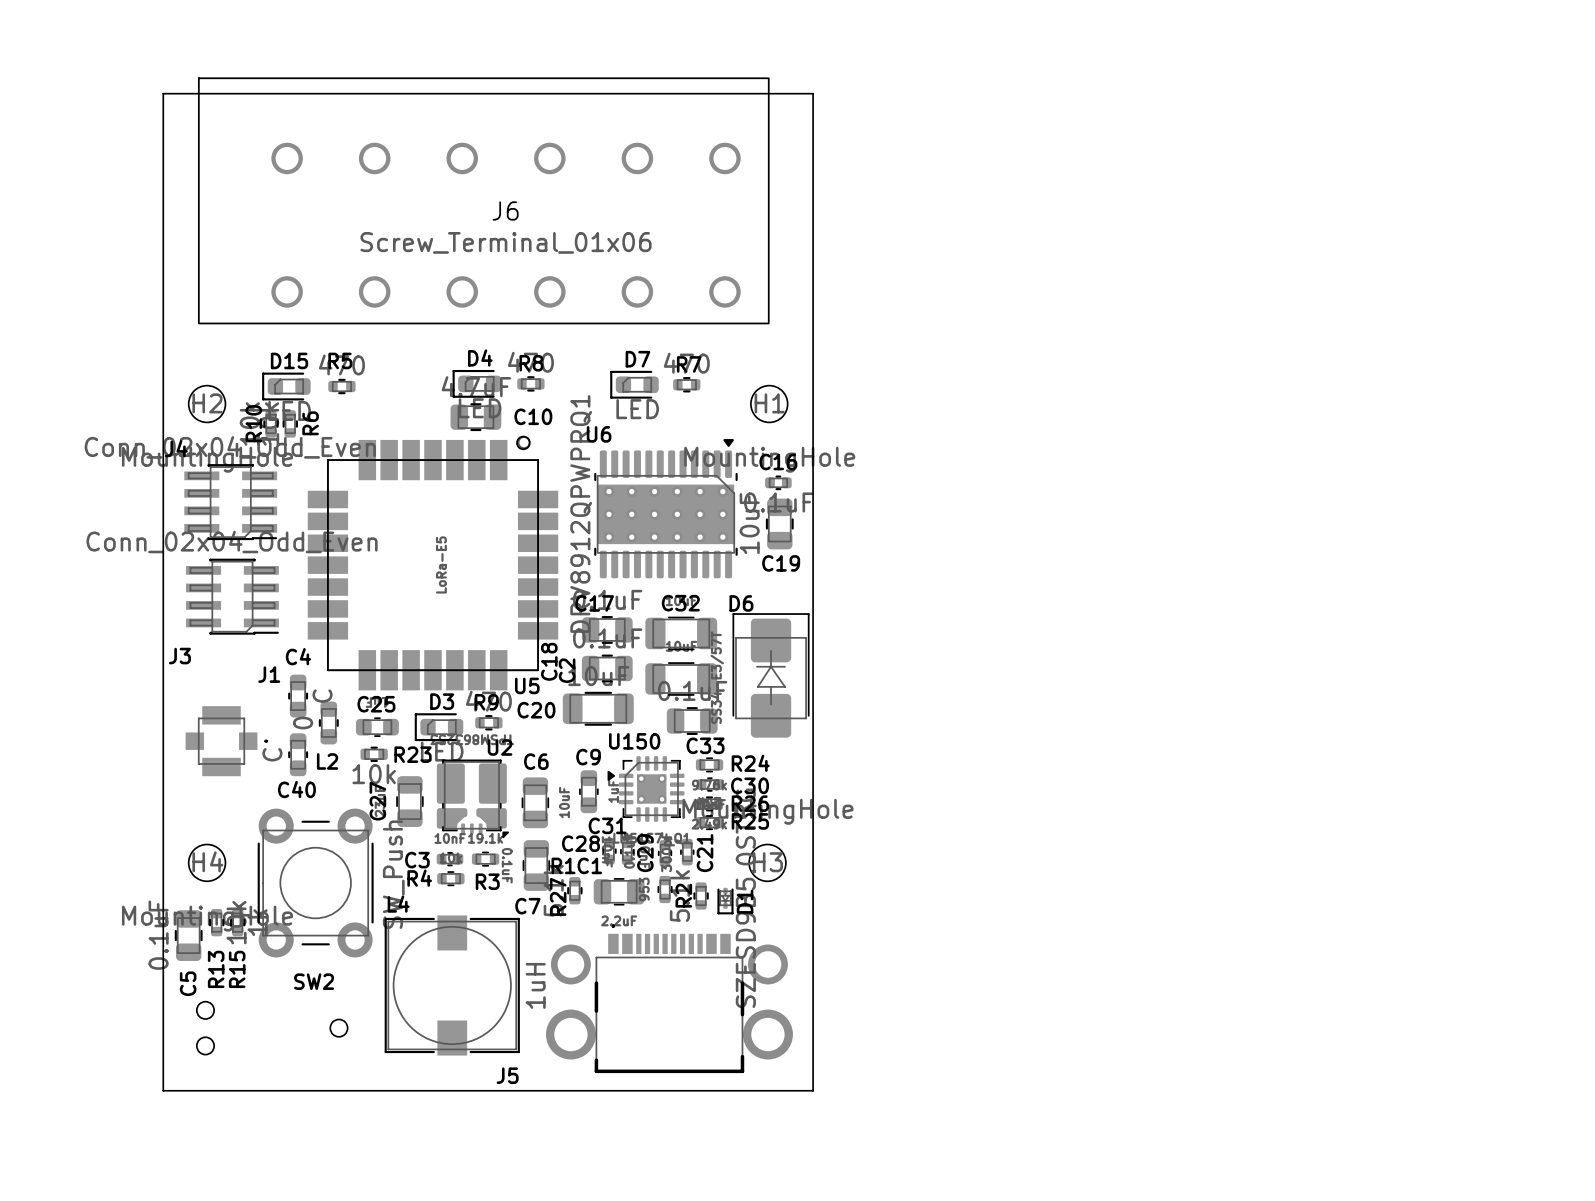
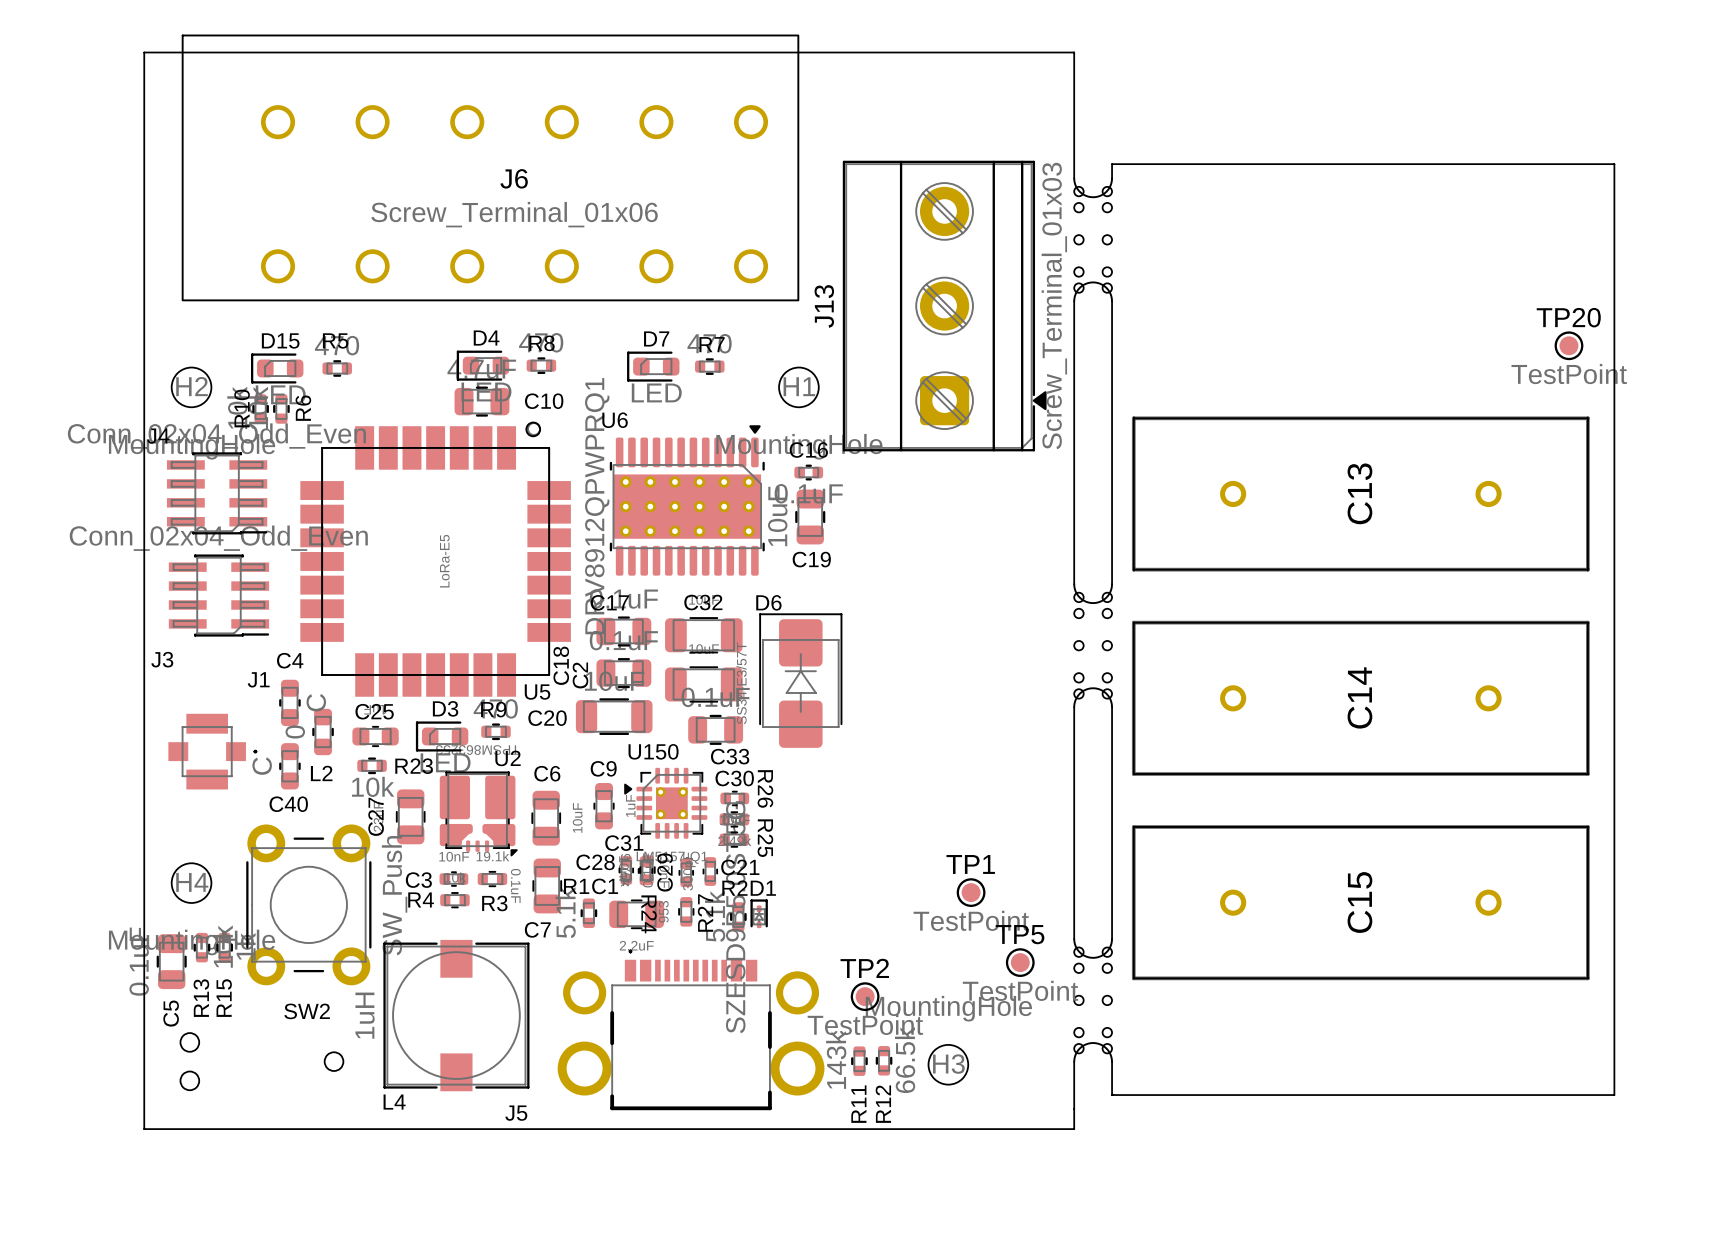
board edge: (163, 93) (813, 93) (813, 1090) (163, 1090) -> (144, 52) (1074, 52) (1074, 178)
board edge: none -> (1112, 178) (1112, 164) (1614, 164) (1614, 1095) (1112, 1095) (1112, 1061)
part: none -> (1093, 239)
board edge: none -> (1074, 301) (1074, 584)
board edge: none -> (1112, 301) (1112, 584)
J13: none -> Screw_Terminal_01x03 (944, 306)
TP20: none -> TestPoint (1568, 345)
C13: none -> (1360, 493)
part: none -> (1093, 645)
C14: none -> (1360, 698)
board edge: none -> (1074, 707) (1074, 938)
board edge: none -> (1112, 707) (1112, 938)
R24 rotation: 0° (709, 764) -> 90° clockwise (647, 870)
R24 position: (709, 764) -> (647, 870)
C30 name position: C30 (750, 785) -> C30 (734, 778)
R26 name rotation: 0° (750, 803) -> 90° clockwise (765, 788)
R25 name rotation: 0° (750, 821) -> 90° clockwise (765, 838)
C21 name rotation: 0° (705, 853) -> 90° clockwise (740, 867)
H3 position: (767, 862) -> (948, 1064)
TP1: none -> TestPoint (971, 892)
C15: none -> (1360, 902)
R2 name rotation: 0° (683, 895) -> 90° clockwise (734, 888)
R27 name position: R27 (558, 896) -> R27 (705, 913)
R2 position: (701, 896) -> (738, 916)
D1 rotation: 0° (725, 901) -> 180° (759, 913)
L4 name position: L4 (398, 904) -> L4 (394, 1102)
TP5: none -> TestPoint (1020, 962)
TP2: none -> TestPoint (865, 996)
part: none -> (1093, 1000)
L4 value position: 1uH (535, 985) -> 1uH (365, 1015)
R11: none -> 143k (859, 1061)
R12: none -> 66.5k (884, 1060)
board edge: none -> (1074, 1061) (1074, 1129) (144, 1129)

